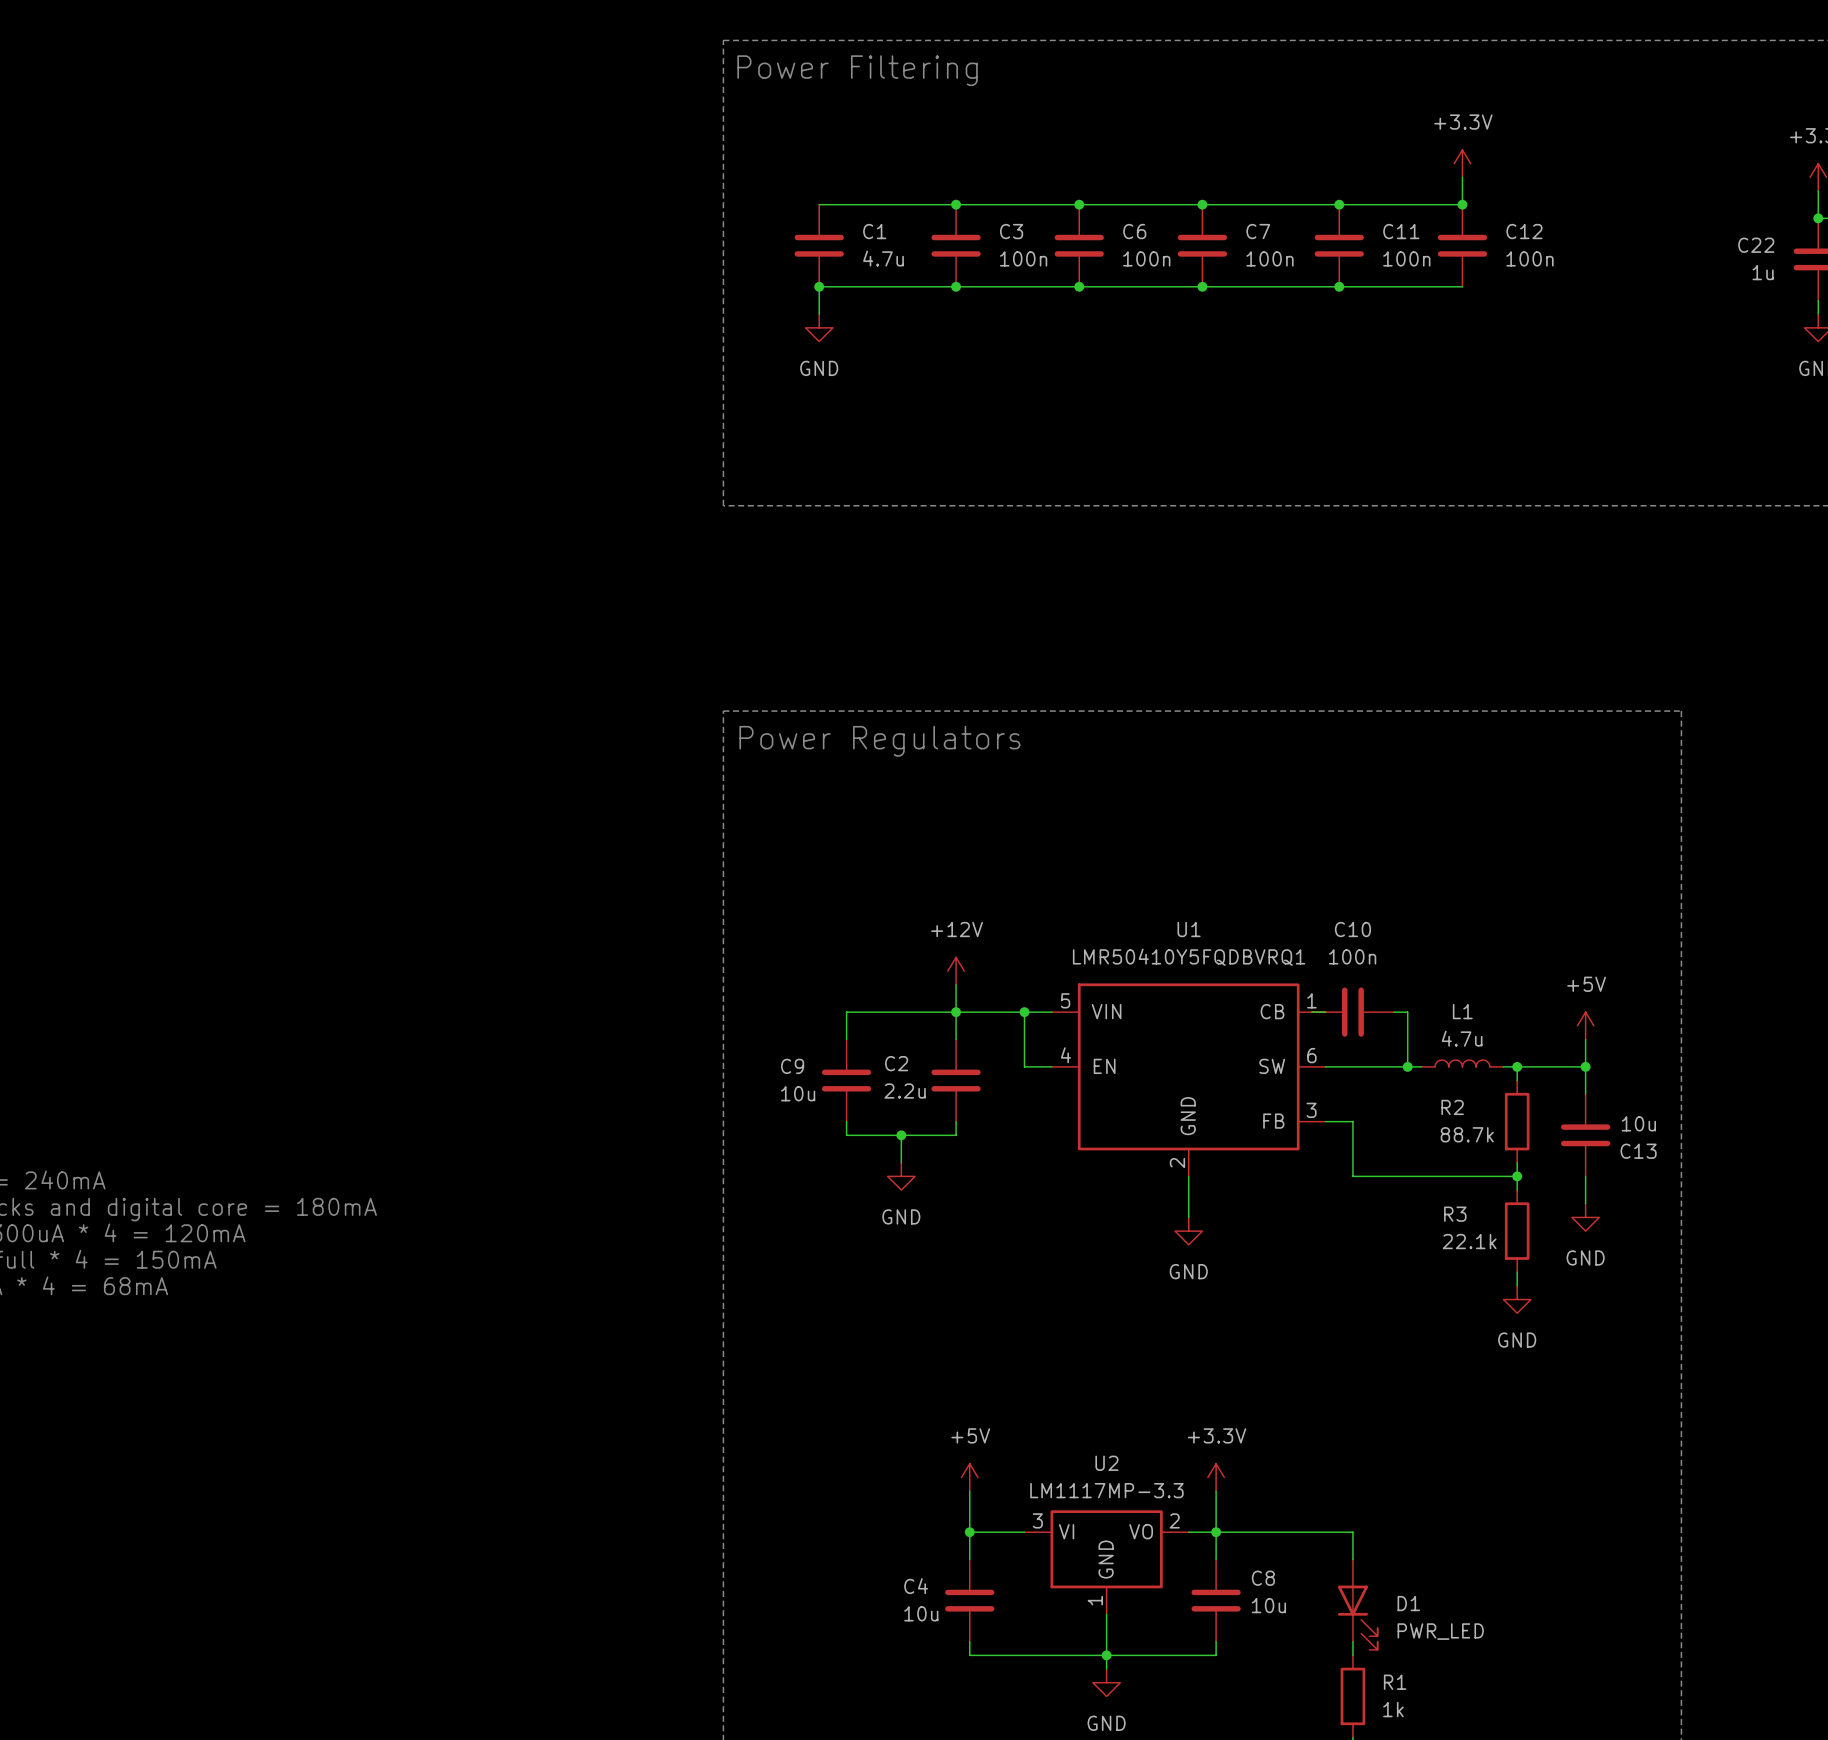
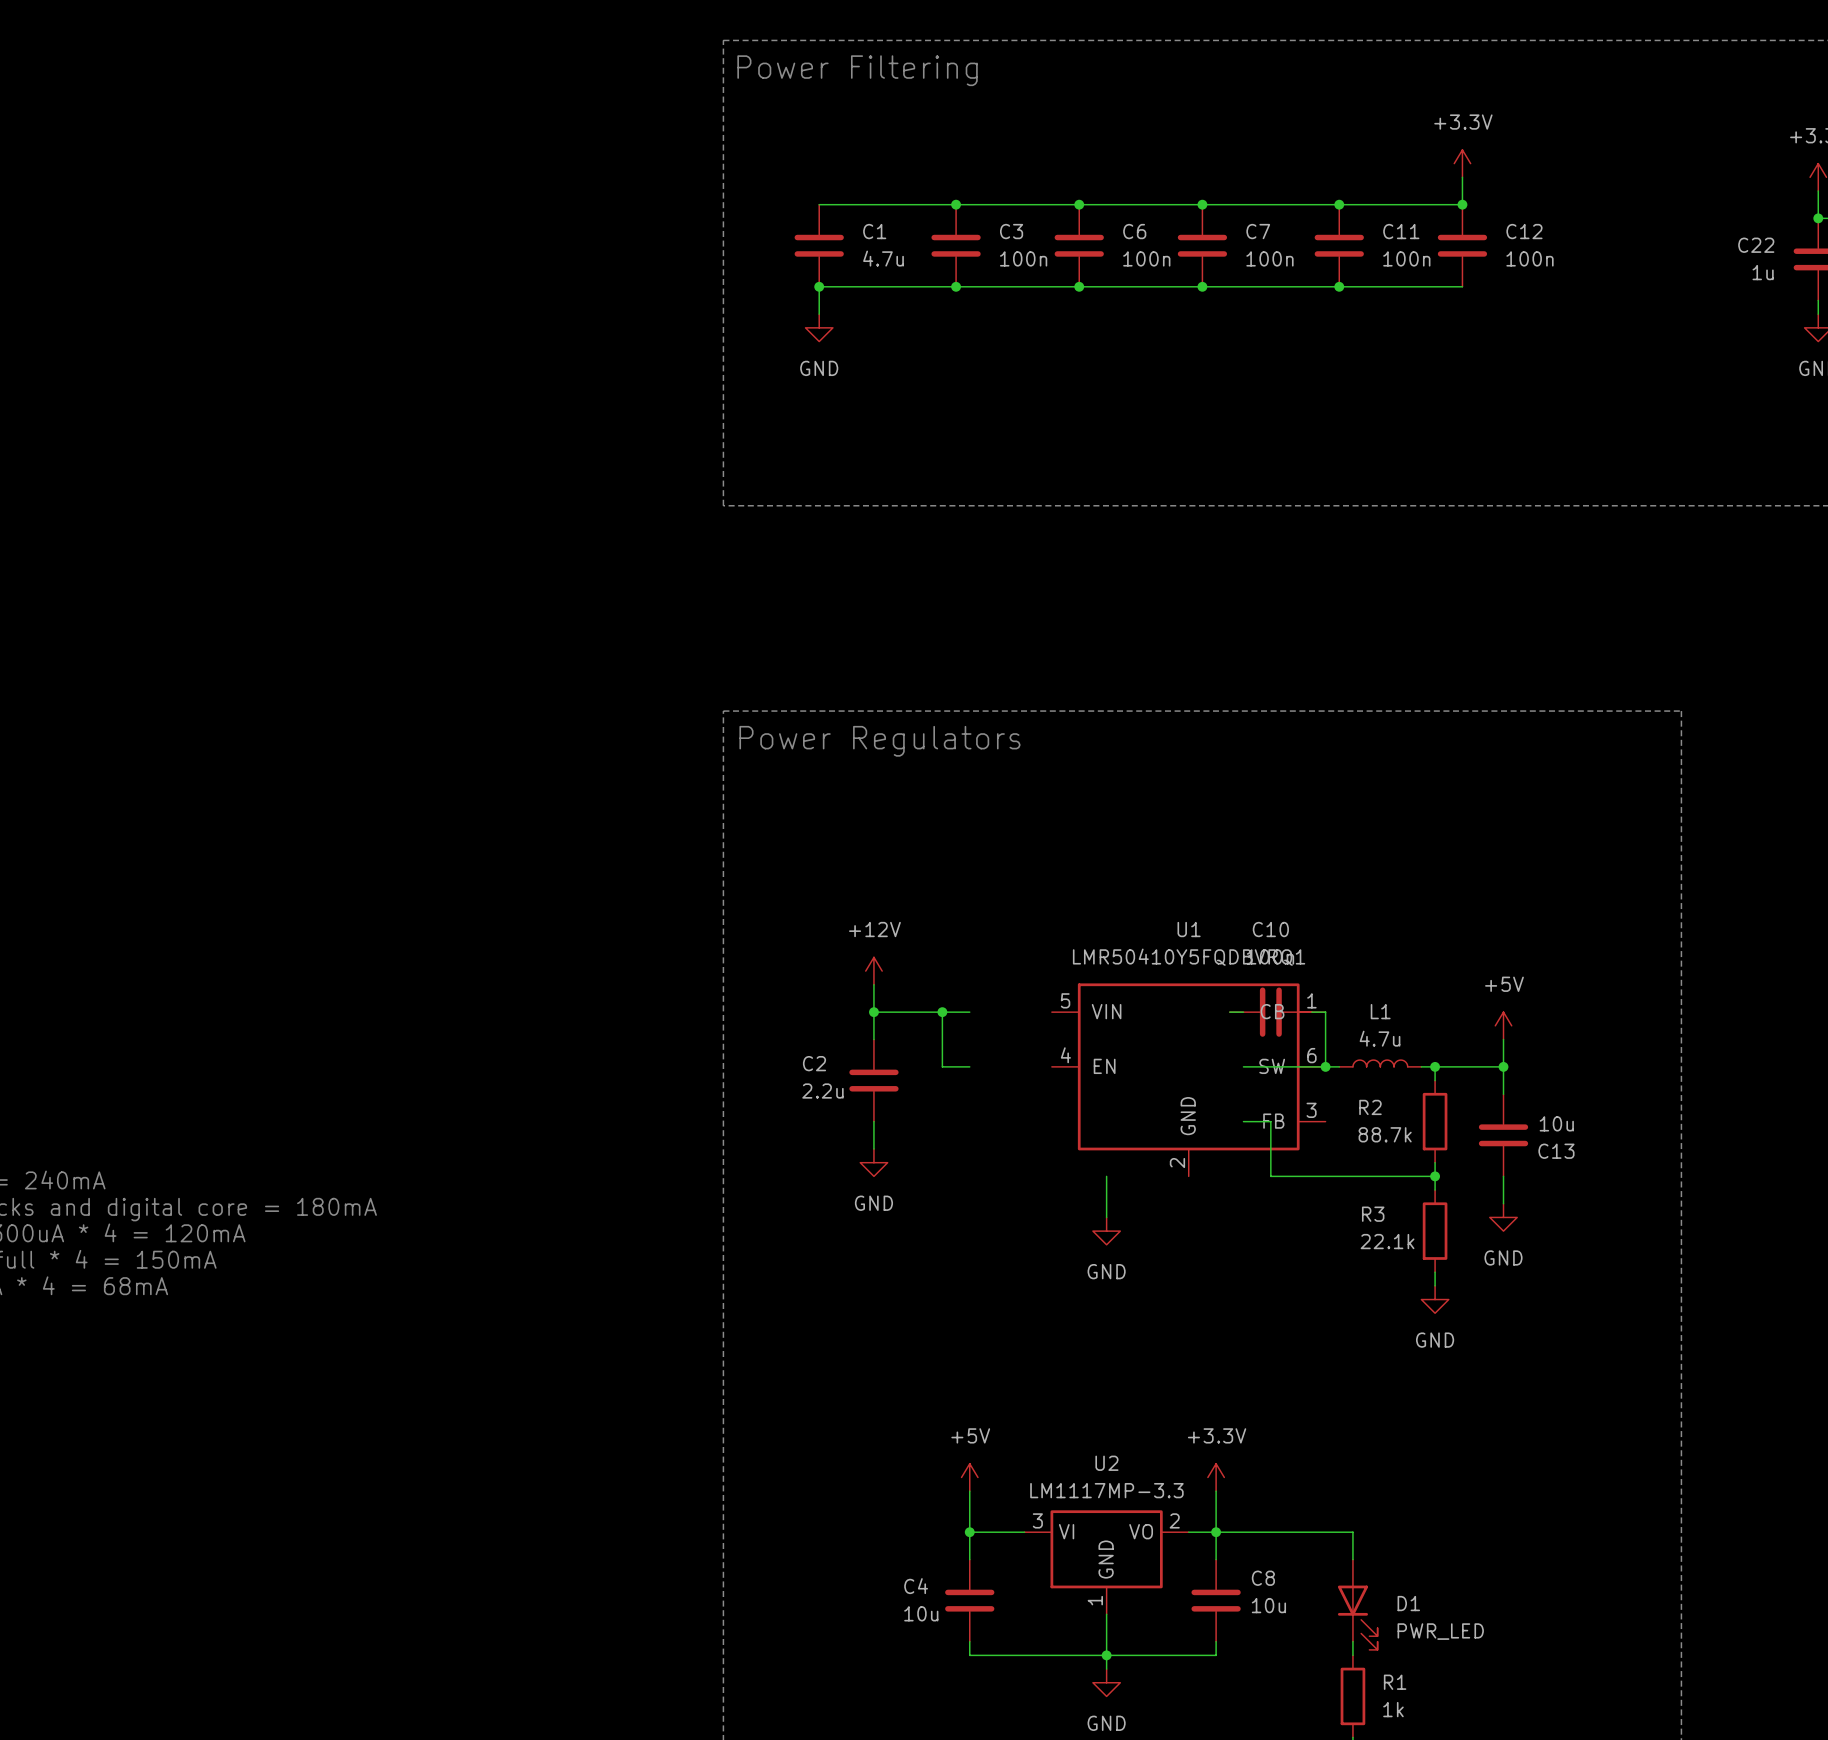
power symbol position: +12V (956, 971) -> +12V (873, 971)
wire: (956, 984) (956, 1039) -> (873, 984) (873, 1039)
wire: (873, 1012) (846, 1012) (846, 1039) -> none
junction: none -> (873, 1012)
junction position: (956, 1012) -> (942, 1012)
wire: (969, 1012) (1051, 1012) -> none
wire: (1024, 1012) (1024, 1066) (1051, 1066) -> (942, 1012) (942, 1066) (969, 1066)
junction: (1024, 1012) -> none
wire: none -> (1325, 1012) (1325, 1066) (1243, 1066)
C10 position: (1352, 1012) -> (1270, 1012)
wire: (1394, 1012) (1407, 1012) (1407, 1066) -> none
power symbol position: +5V (1585, 1025) -> +5V (1503, 1025)
wire: (1585, 1039) (1585, 1094) -> (1503, 1039) (1503, 1094)
L1 position: (1462, 1063) -> (1380, 1063)
junction: none -> (1325, 1066)
wire: (1339, 1066) (1421, 1066) -> none
junction position: (1407, 1066) -> (1435, 1066)
wire: (1503, 1066) (1585, 1066) -> (1503, 1066) (1421, 1066)
wire: (1517, 1066) (1517, 1080) -> (1435, 1066) (1435, 1080)
junction position: (1517, 1066) -> (1503, 1066)
junction: (1585, 1066) -> none
C9: 10u (846, 1080) -> none
C2 position: (956, 1080) -> (873, 1080)
wire: (846, 1121) (846, 1135) (956, 1135) (956, 1121) -> none
wire: (1325, 1121) (1352, 1121) (1352, 1176) -> (1243, 1121) (1270, 1121) (1270, 1176) (1352, 1176)
R2 position: (1517, 1121) -> (1435, 1121)
wire: (901, 1135) (901, 1162) -> (873, 1121) (873, 1149)
junction: (901, 1135) -> none
C13 position: (1585, 1135) -> (1503, 1135)
wire: (1517, 1162) (1517, 1190) -> (1435, 1162) (1435, 1190)
power symbol position: GND (901, 1176) -> GND (873, 1162)
wire: (1188, 1176) (1188, 1217) -> (1106, 1176) (1106, 1217)
wire: (1435, 1176) (1517, 1176) -> none
junction: none -> (1435, 1176)
junction: (1517, 1176) -> none
wire: (1585, 1176) (1585, 1203) -> (1503, 1176) (1503, 1203)
power symbol: none -> GND (1503, 1217)
power symbol: GND (1585, 1217) -> none
power symbol position: GND (1188, 1231) -> GND (1106, 1231)
R3 position: (1517, 1231) -> (1435, 1231)
wire: (1517, 1272) (1517, 1285) -> (1435, 1272) (1435, 1285)
power symbol: none -> GND (1435, 1299)
power symbol: GND (1517, 1299) -> none

